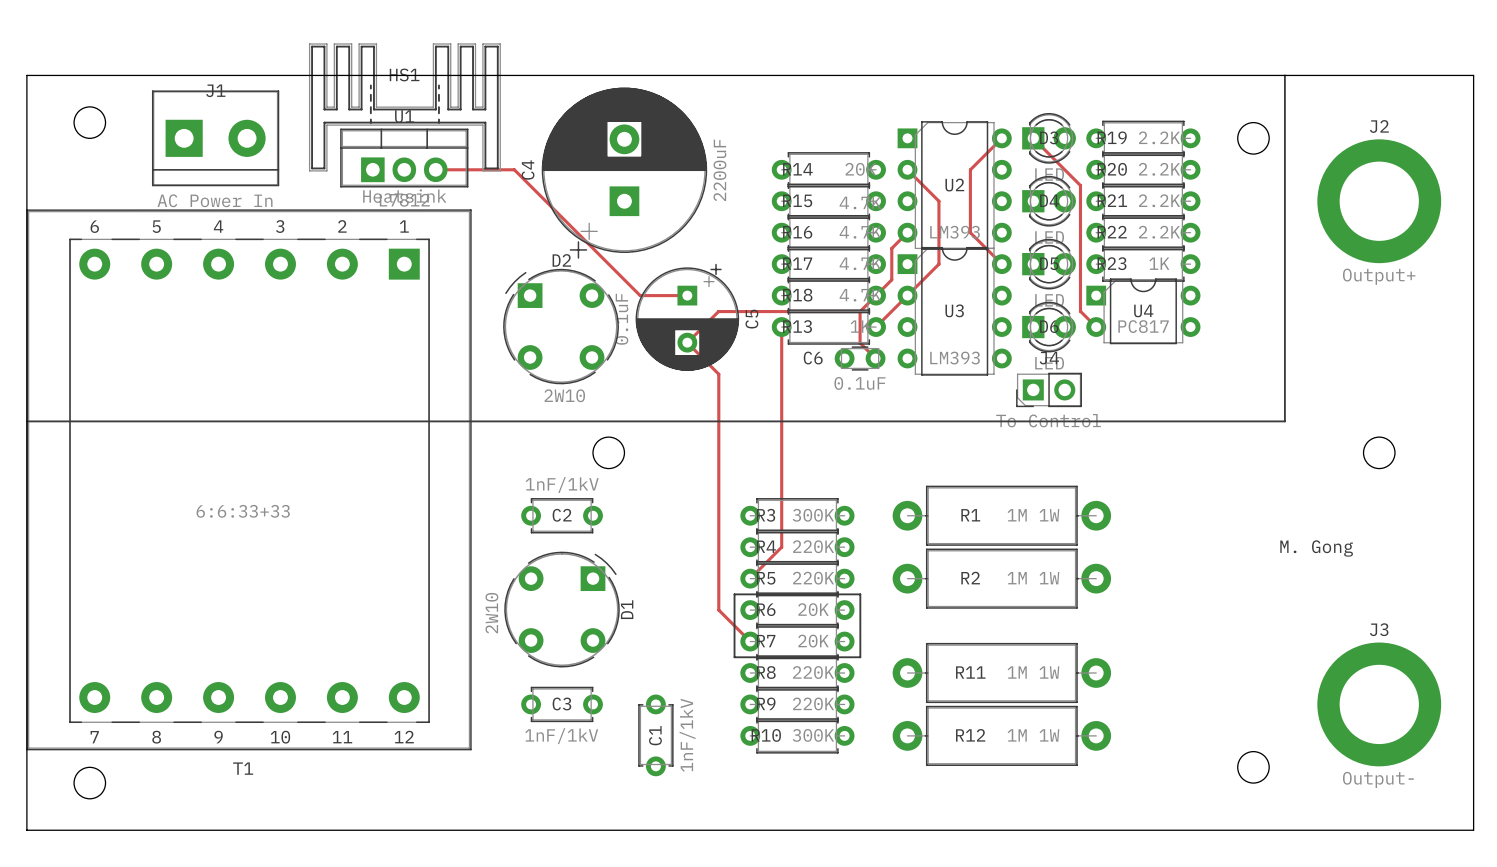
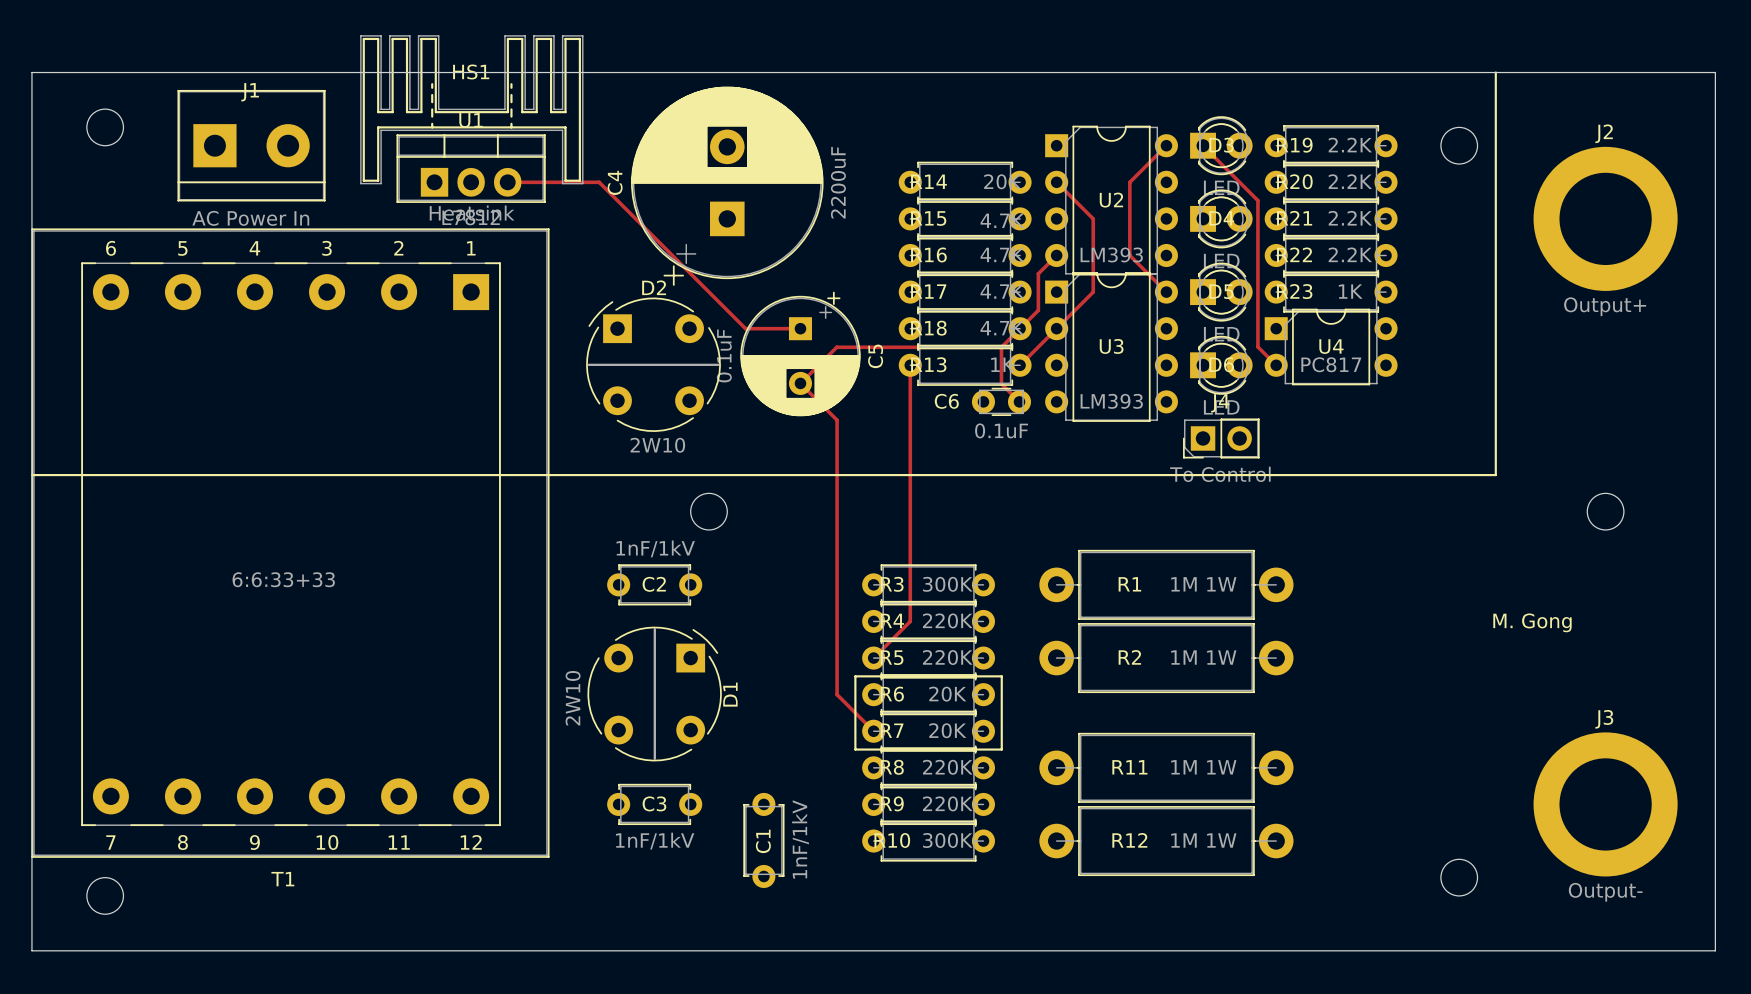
D2 footprint: [503, 268, 619, 385] -> [586, 297, 721, 432]
D1 footprint: [504, 551, 620, 668] -> [587, 626, 722, 762]

